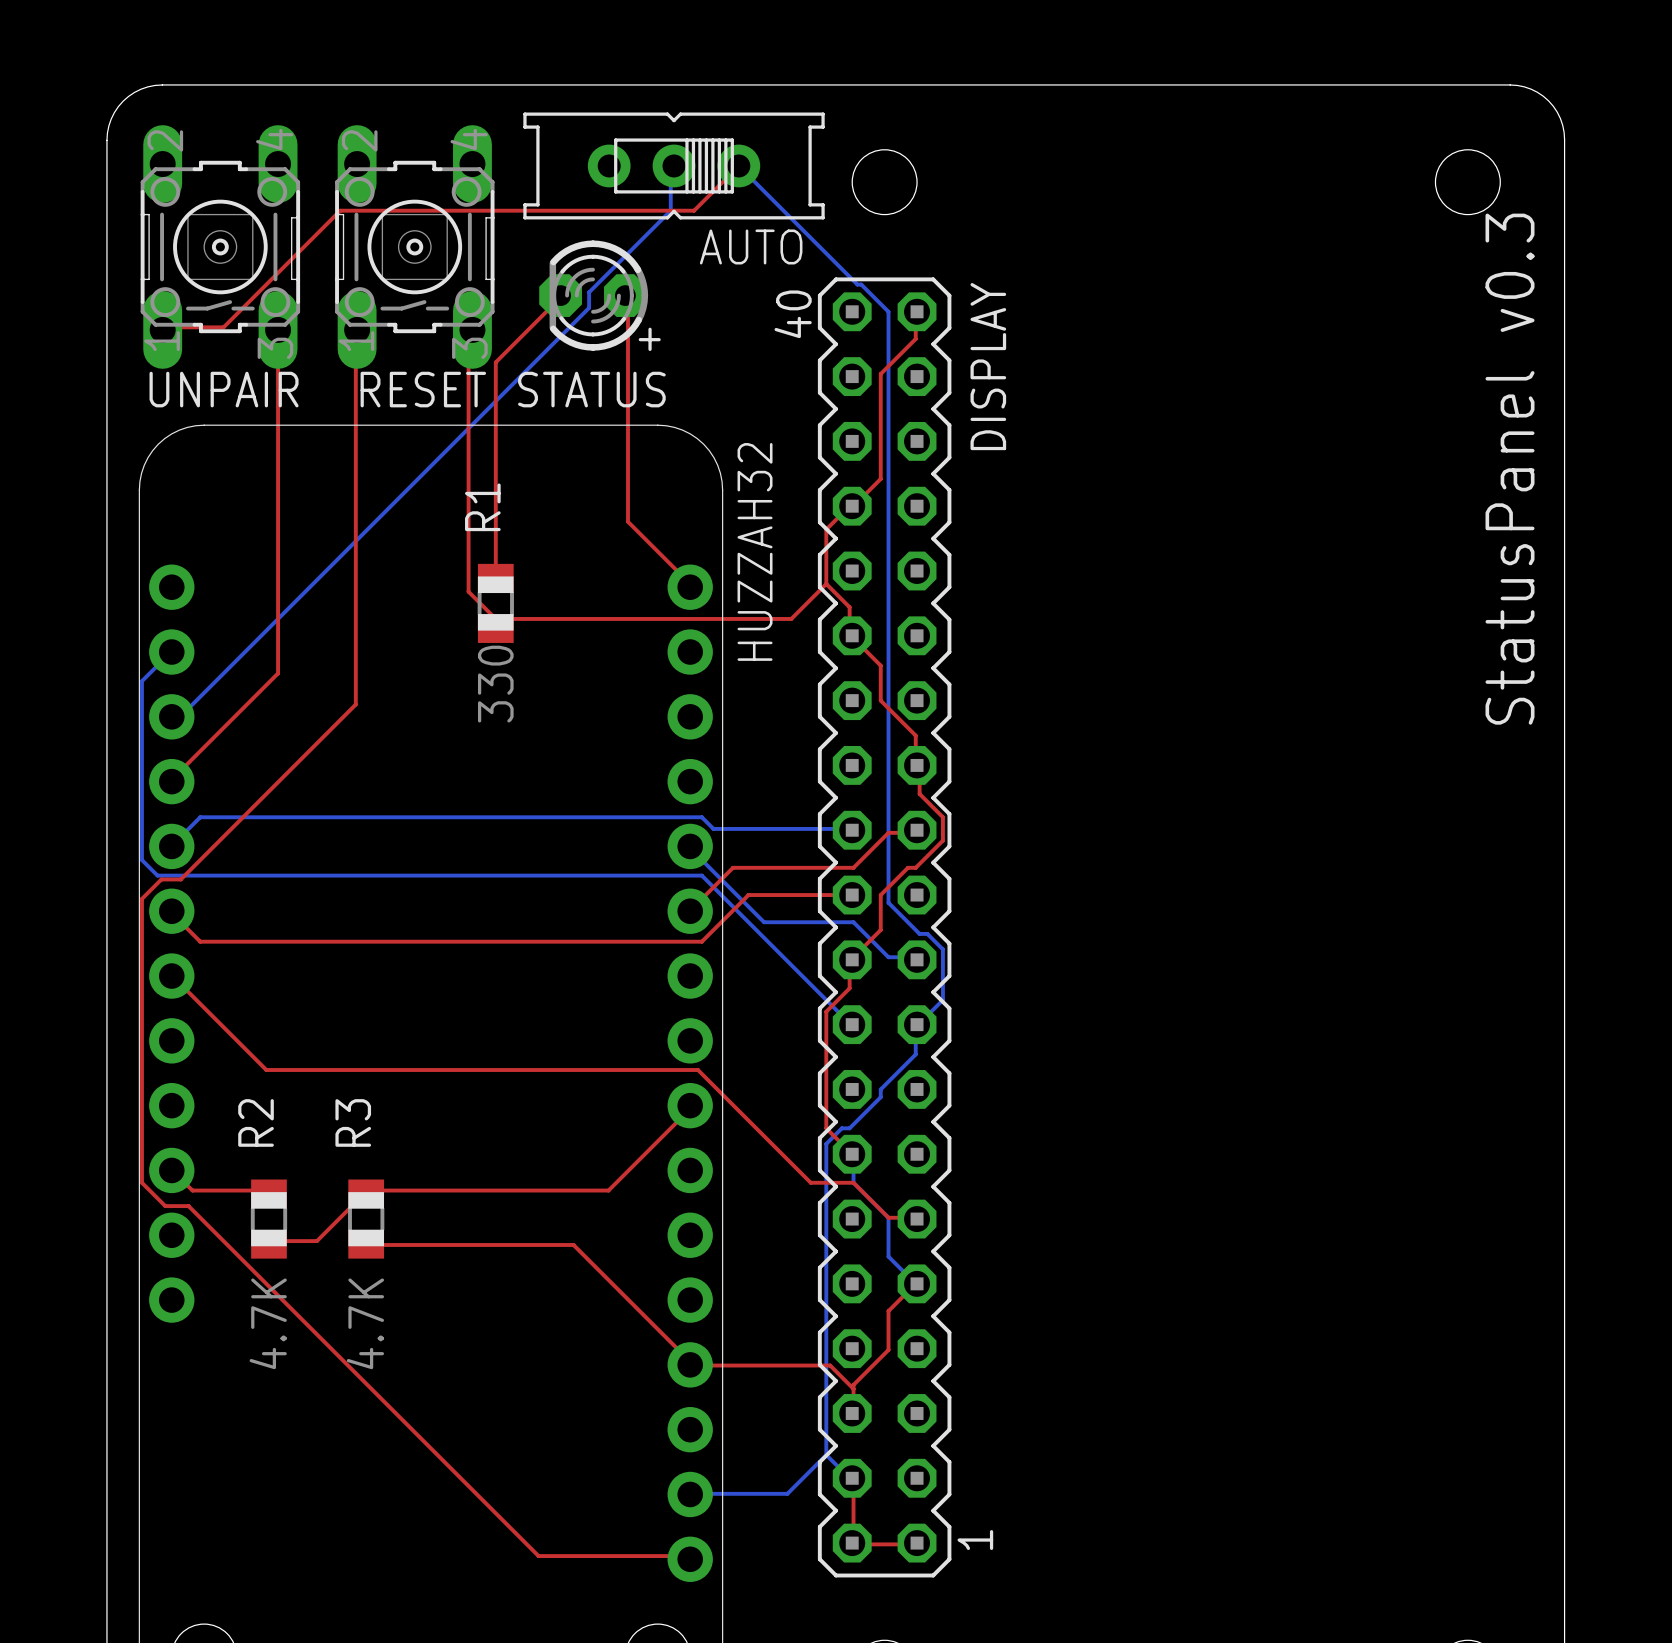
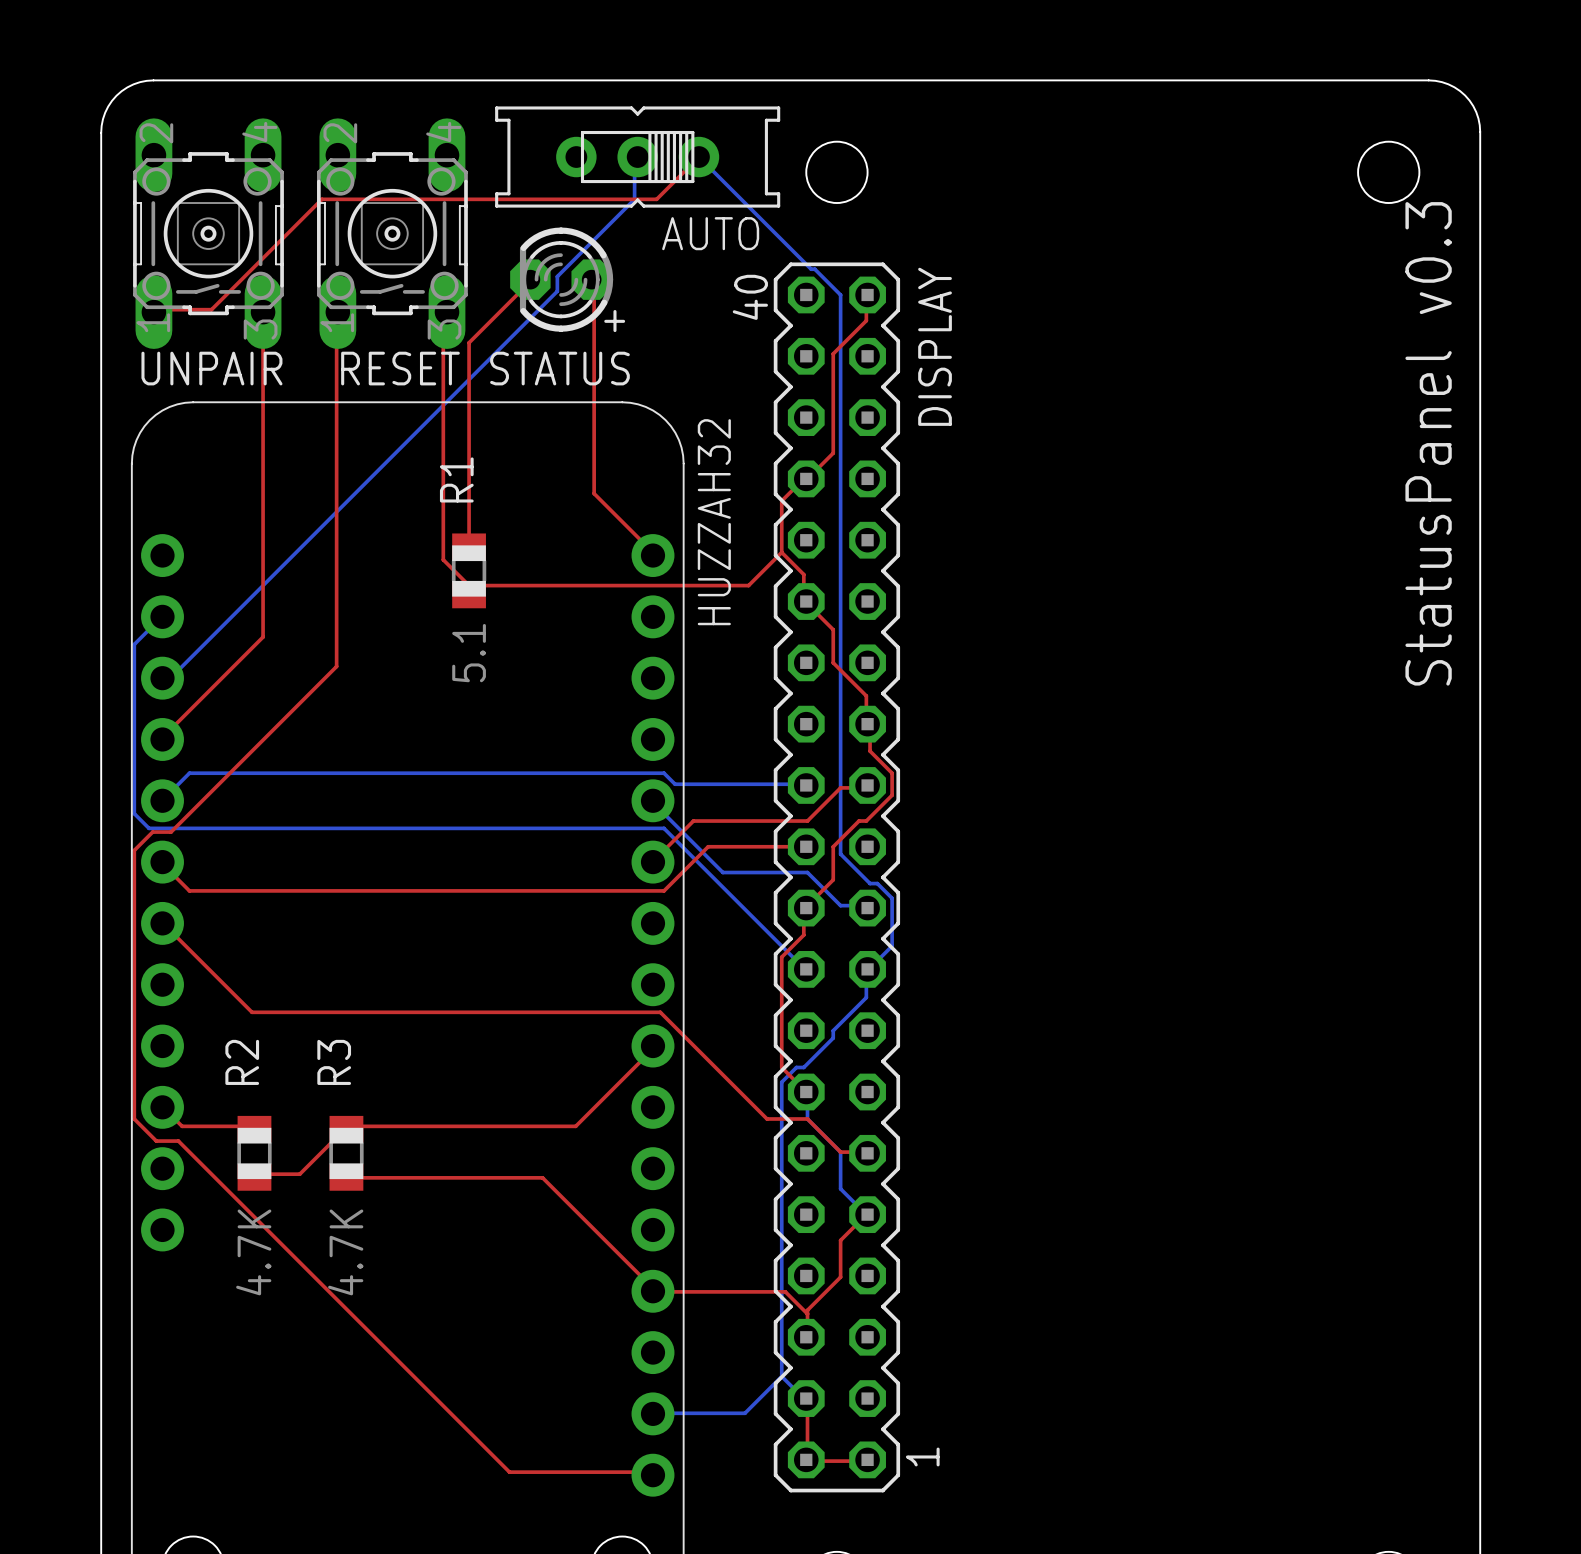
R1 value: 330 (495, 684) -> 5.1 (469, 653)

